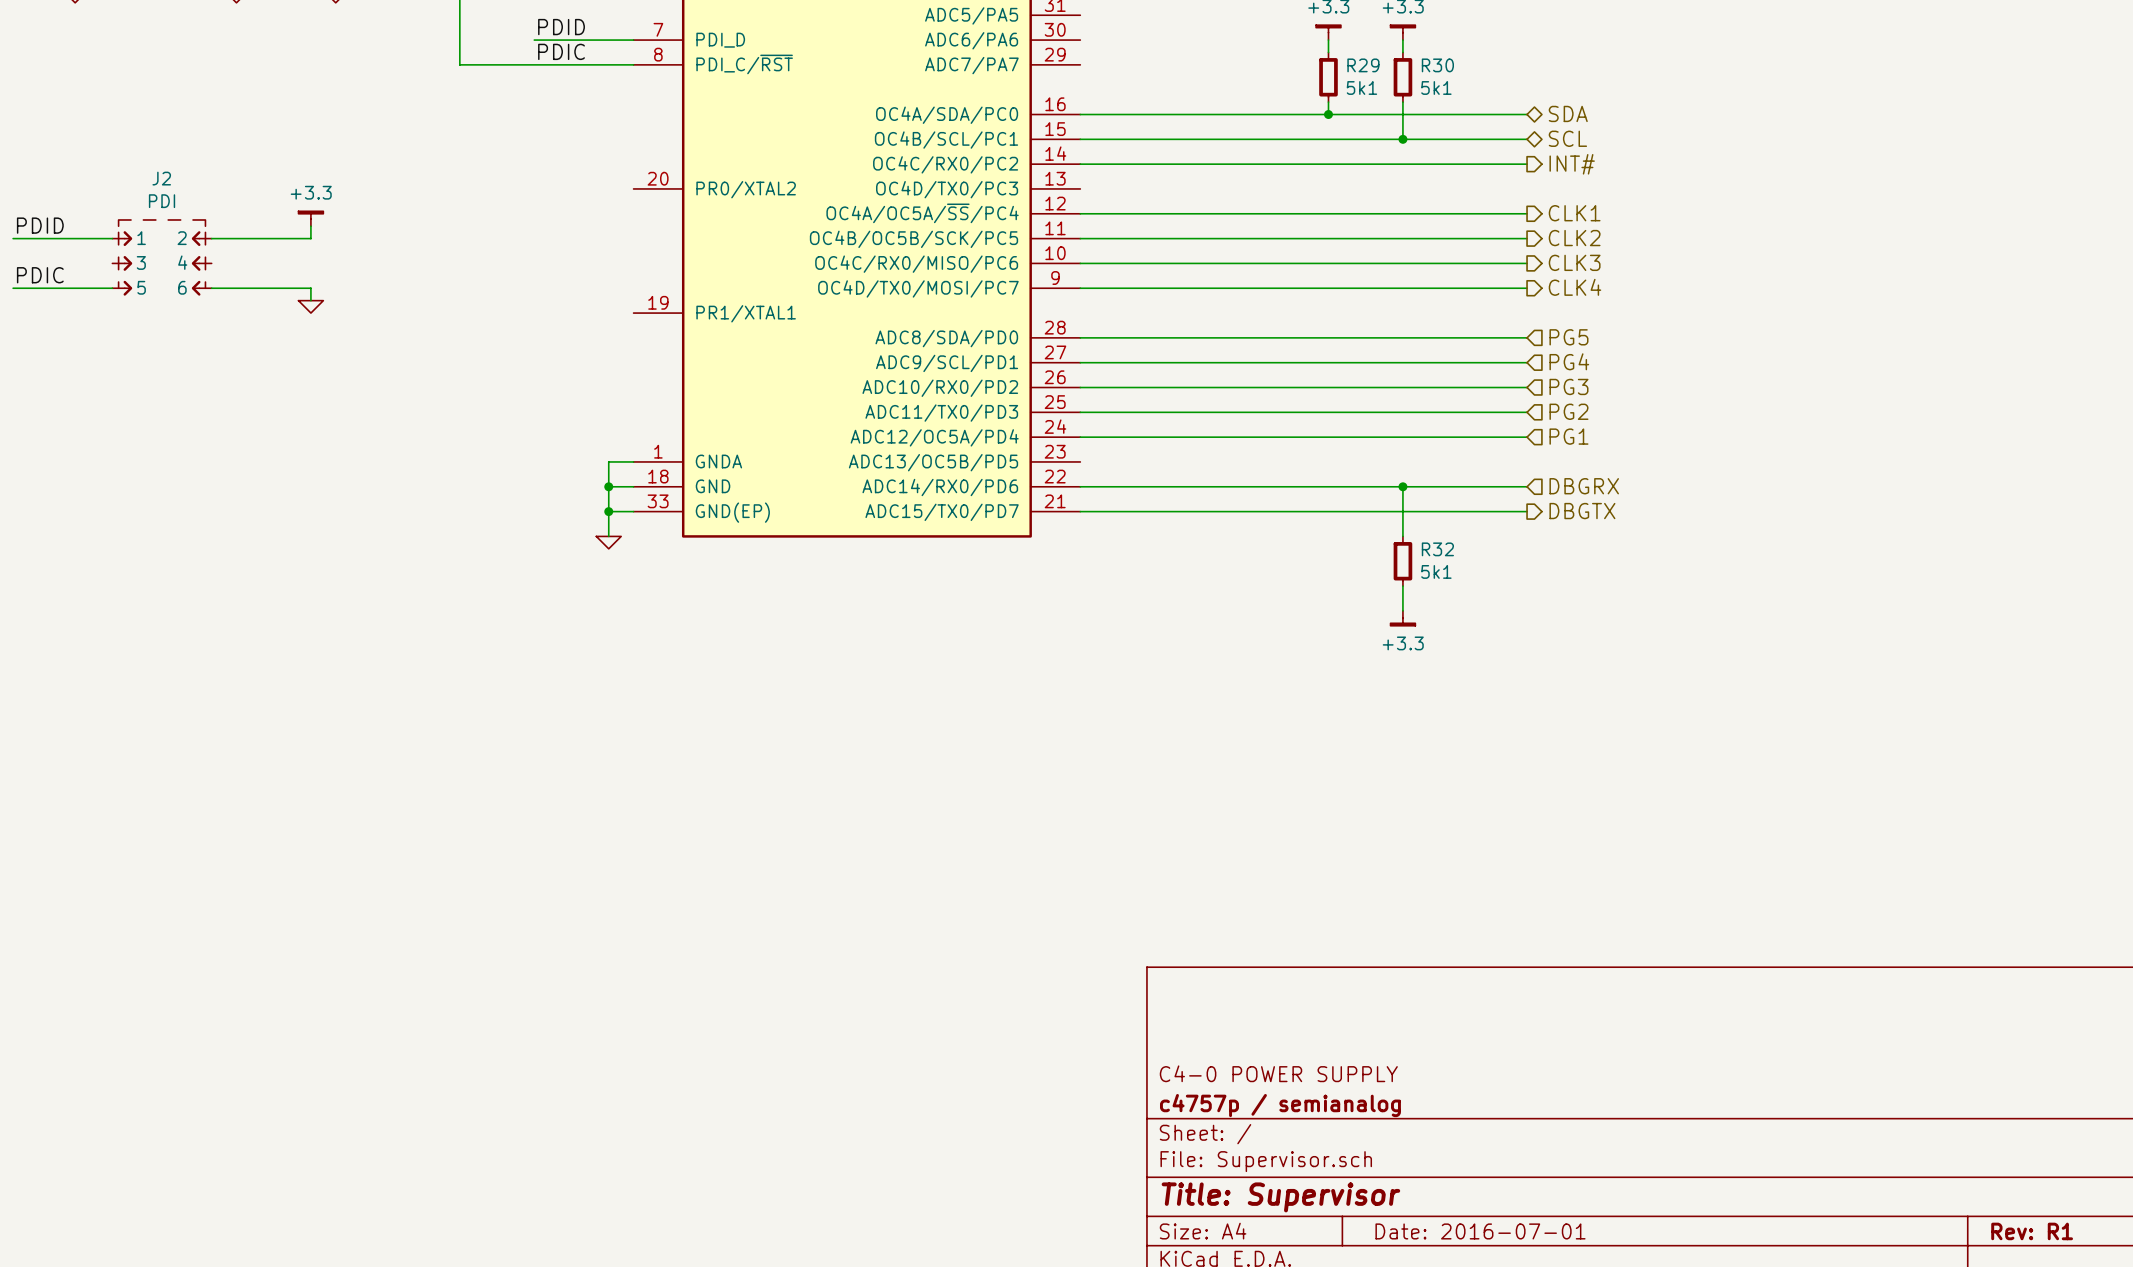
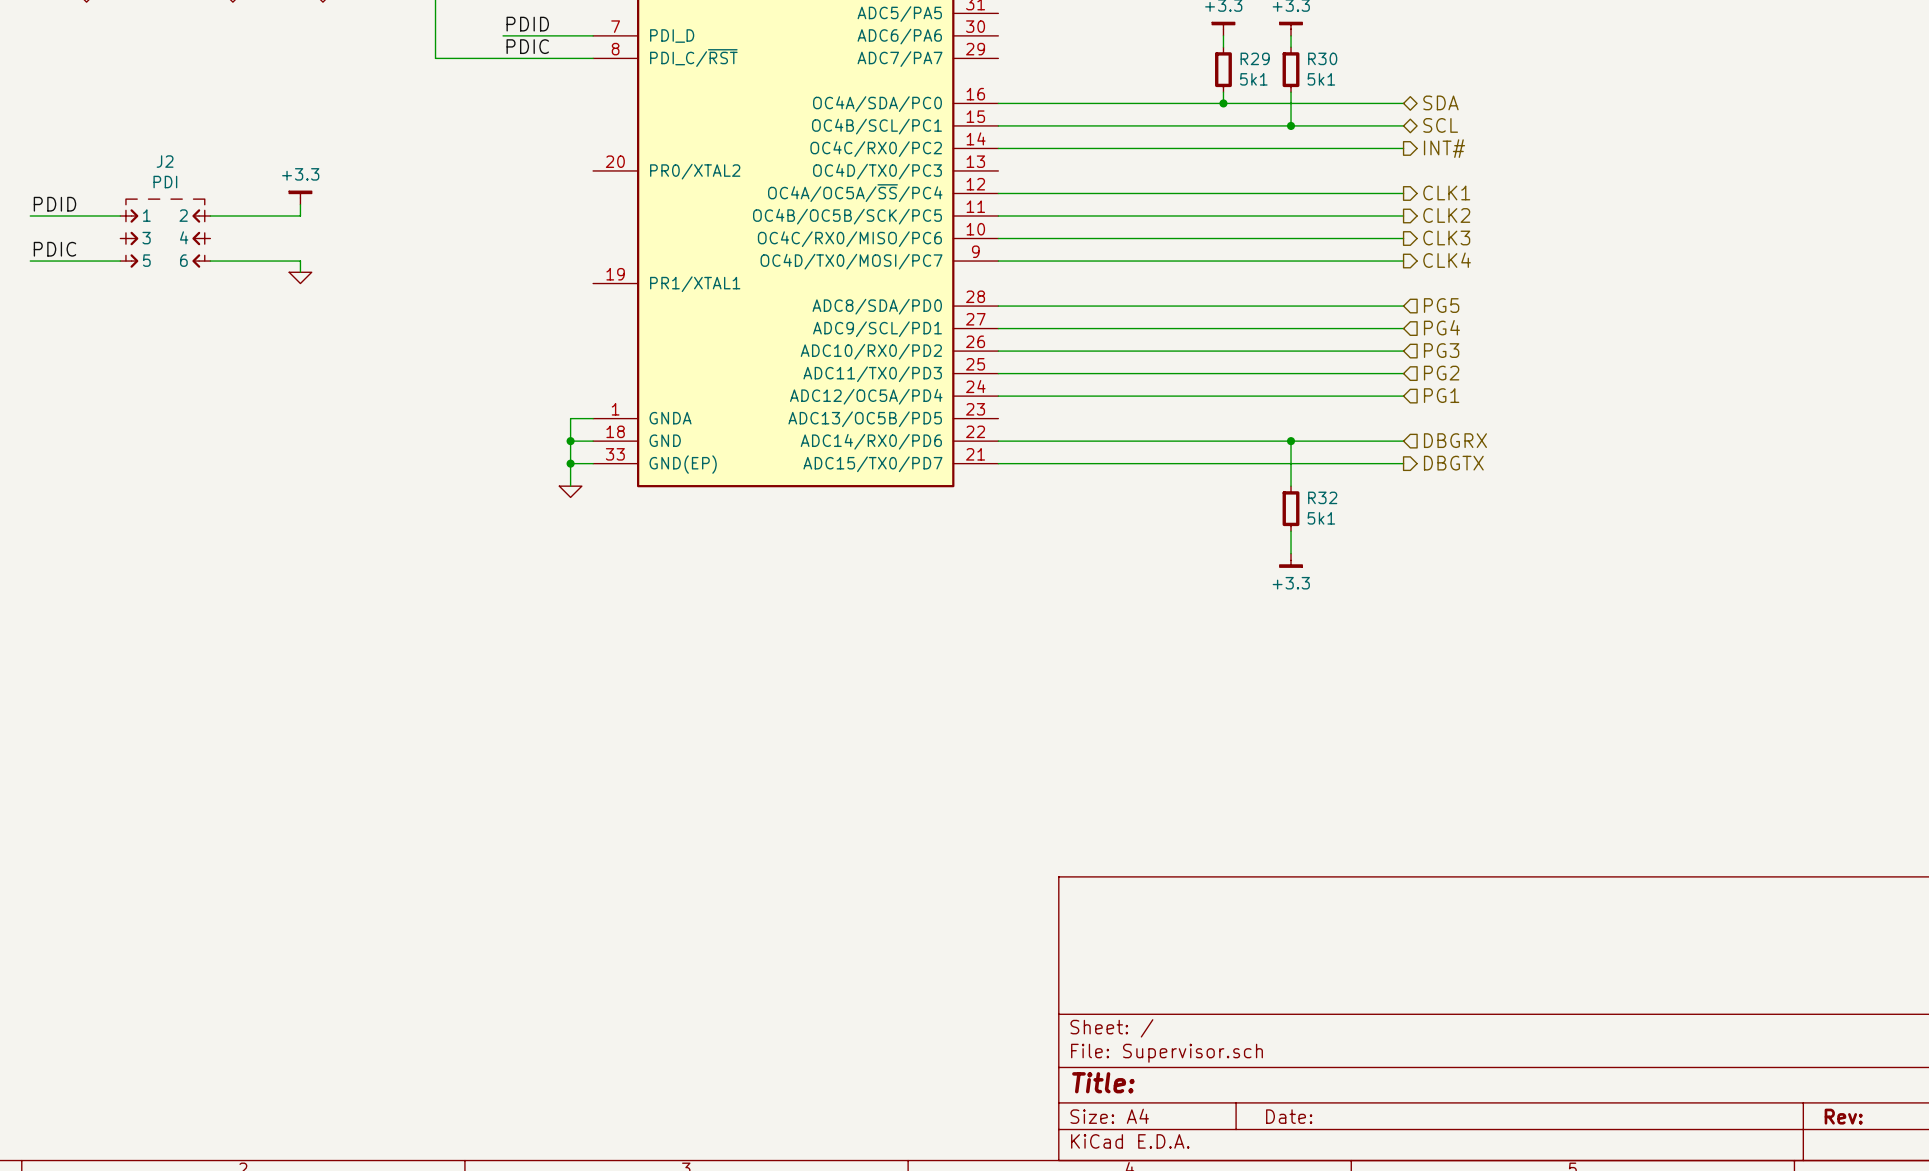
title block: C4-0 POWER SUPPLY (1278, 1073) -> none
title block: c4757p / semianalog (1280, 1105) -> none
title block: Title: Supervisor (1280, 1197) -> Title: (1103, 1082)
title block: Date: 2016-07-01 (1480, 1231) -> Date: (1289, 1116)
title block: Rev: R1 (2032, 1231) -> Rev: (1843, 1116)

